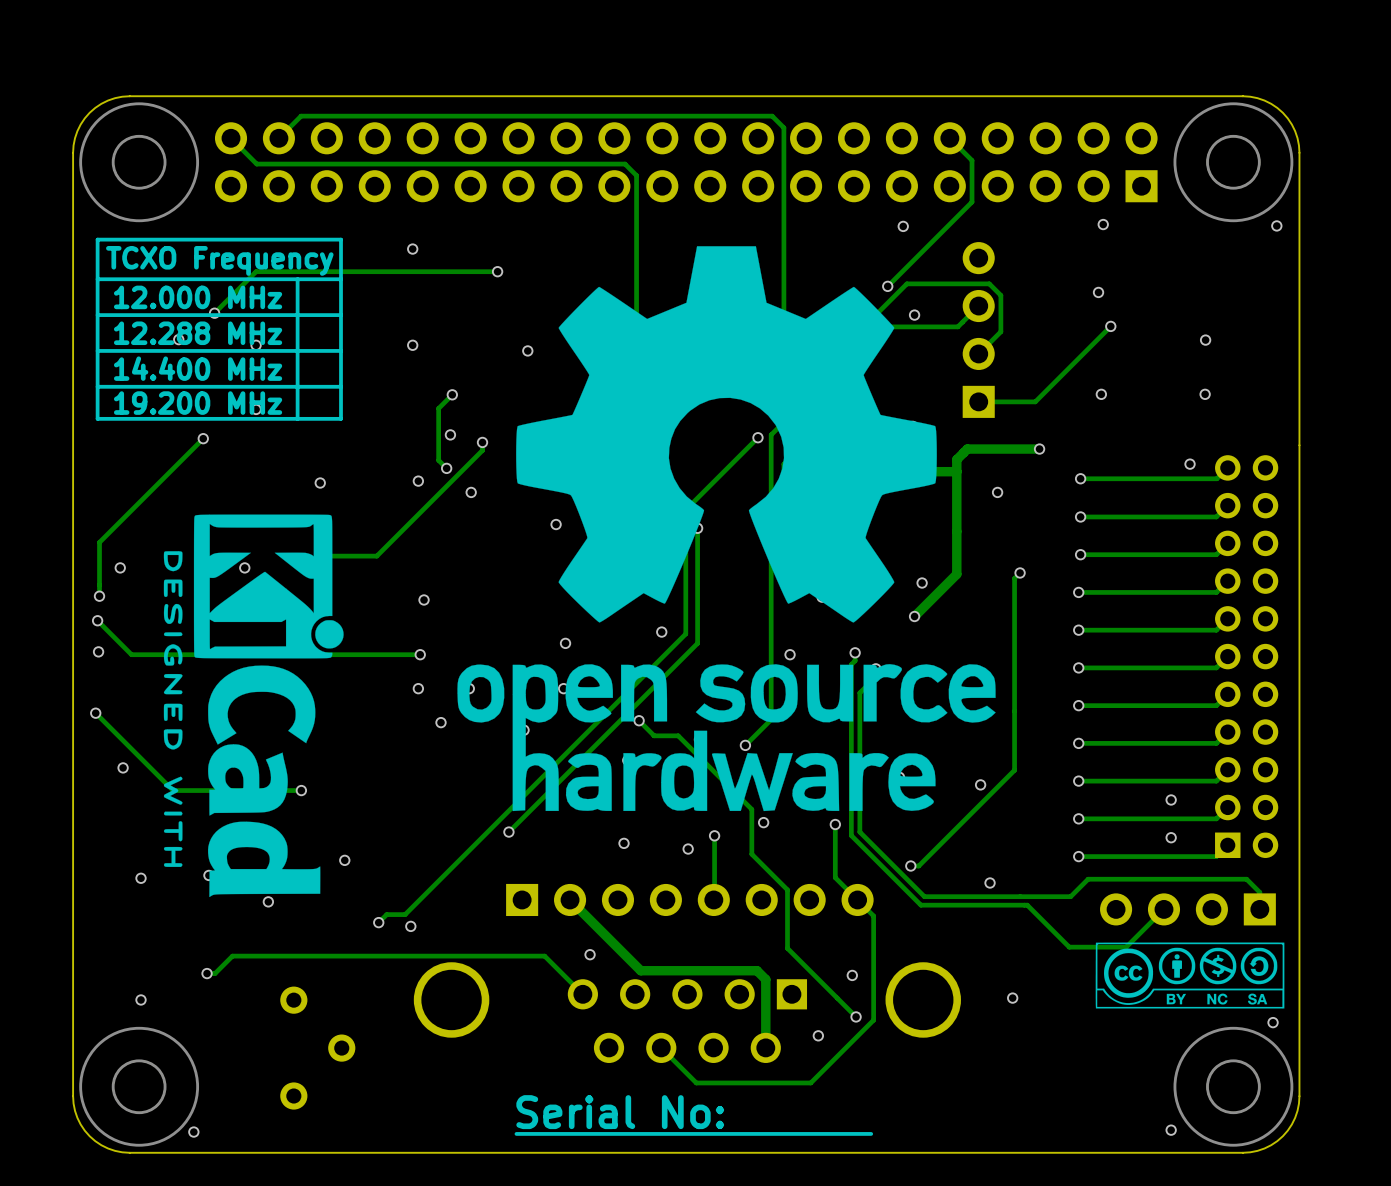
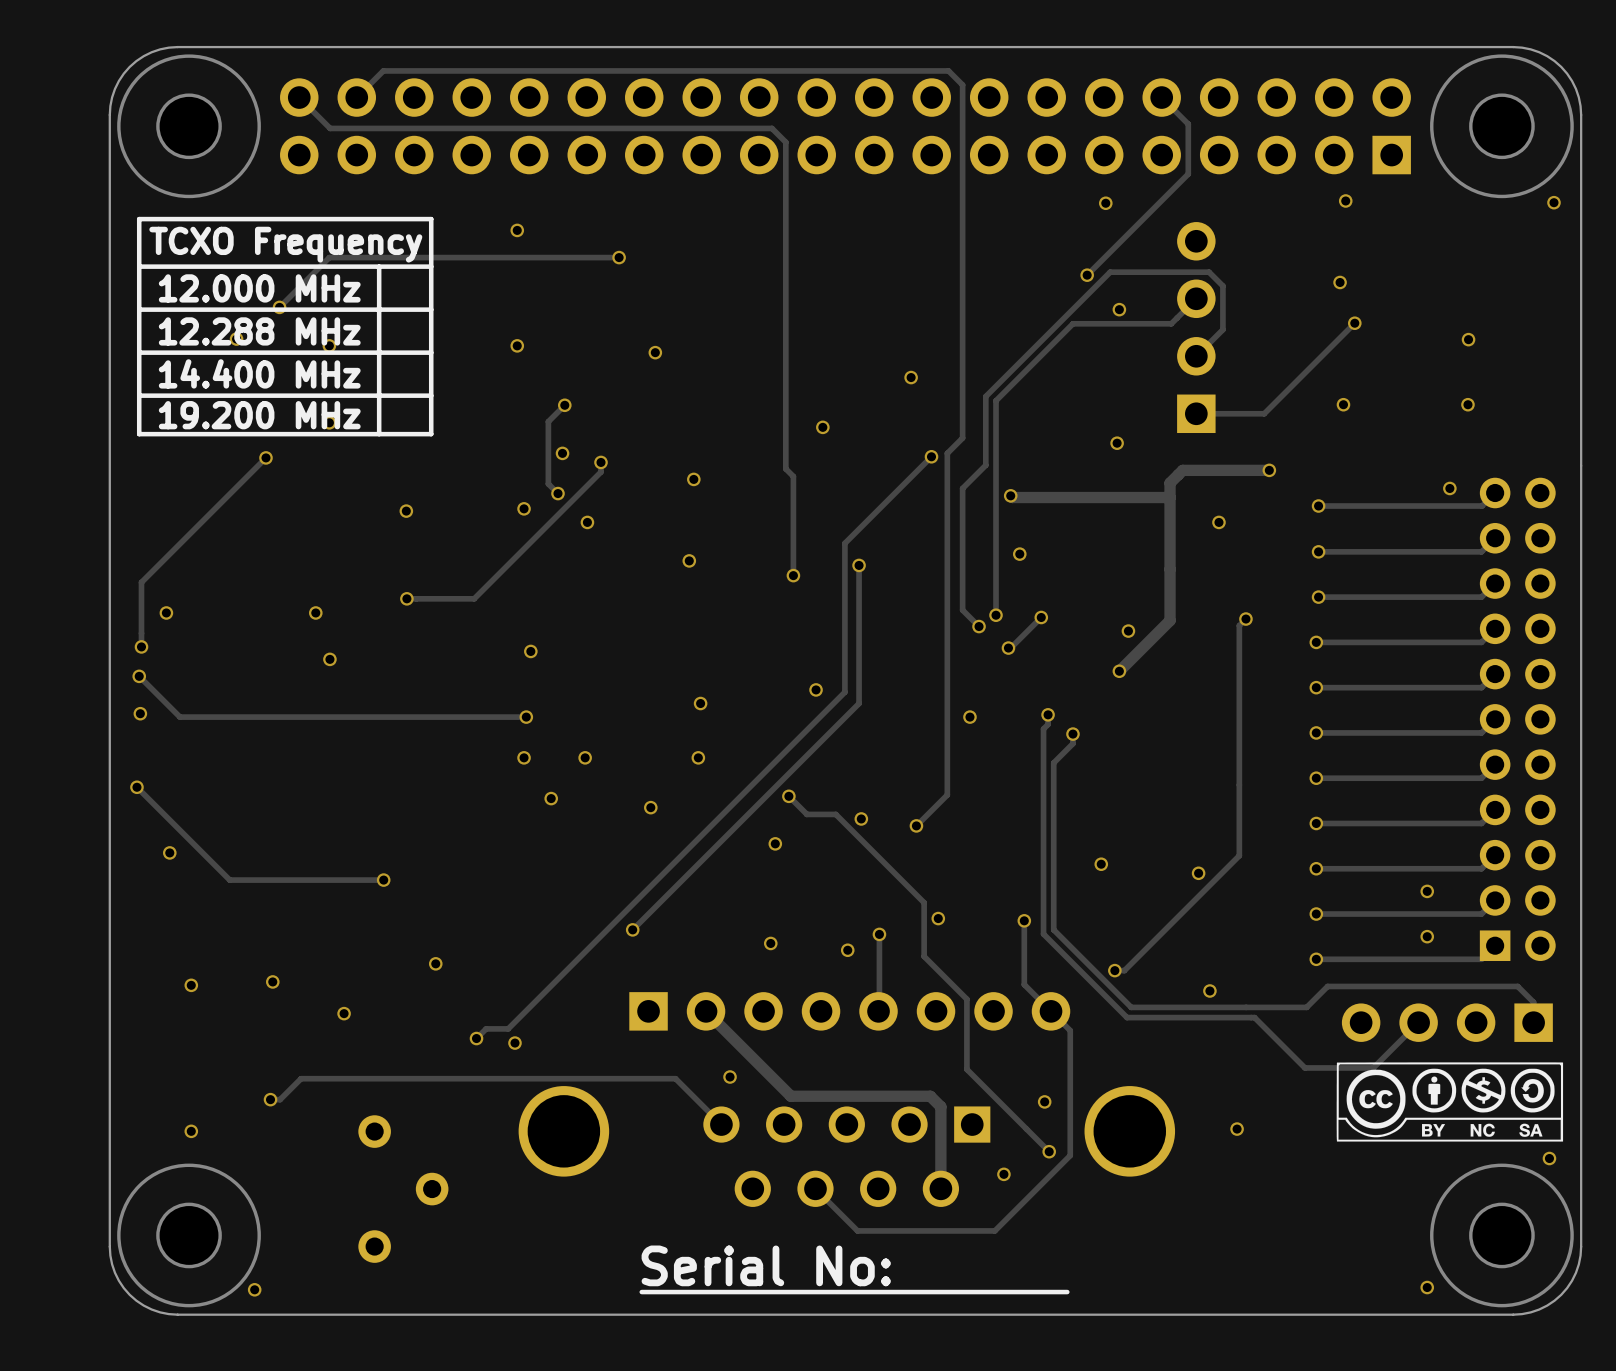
drawing: [457, 246, 996, 812] -> none
drawing: [163, 514, 344, 898] -> none

